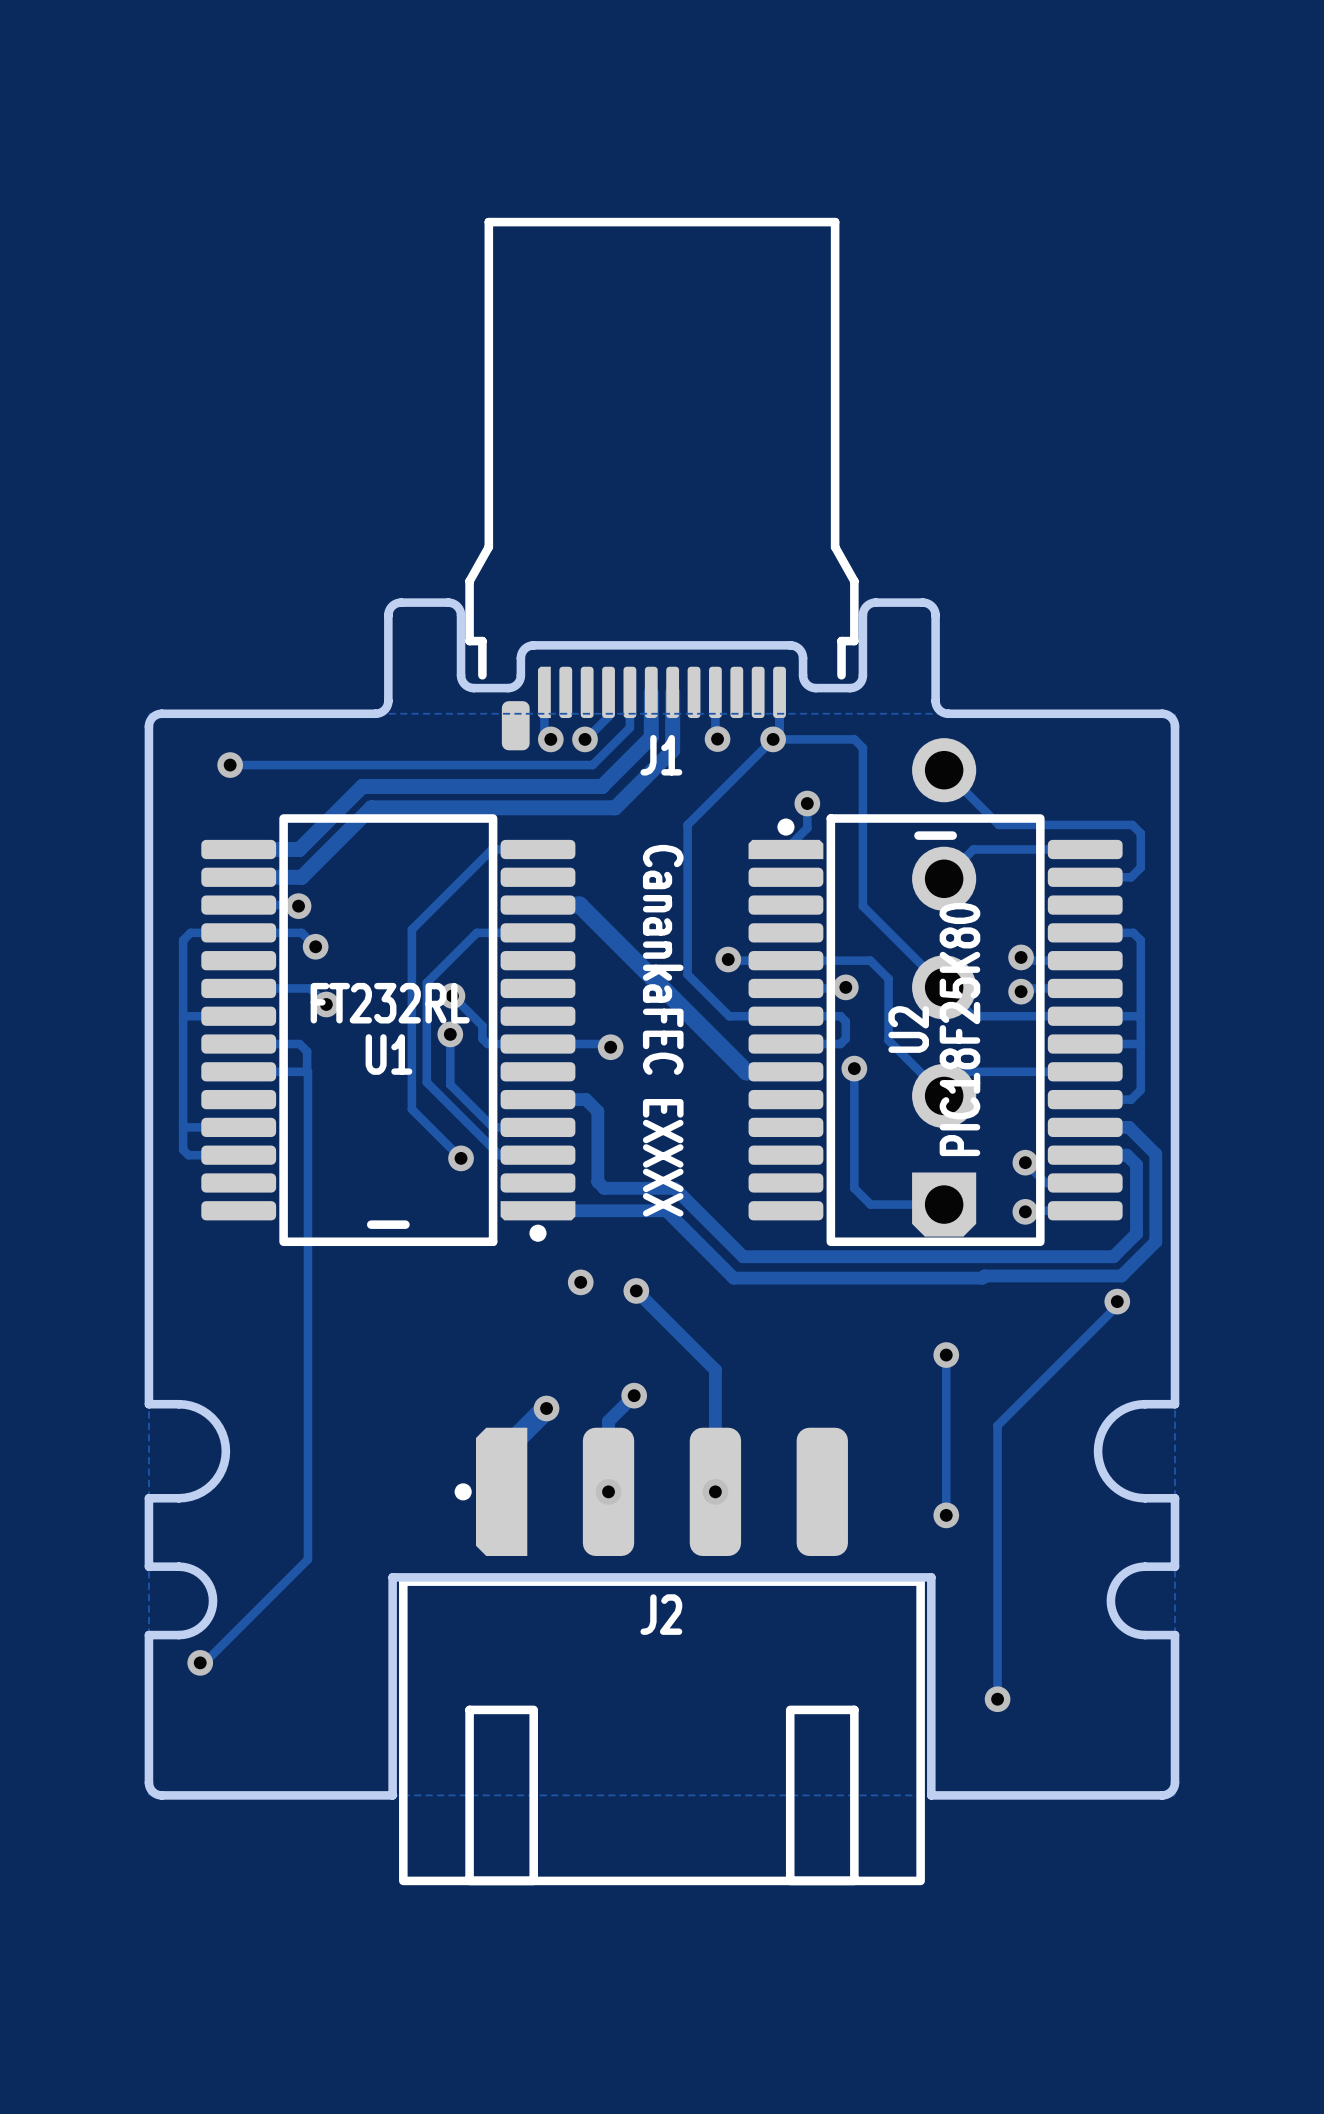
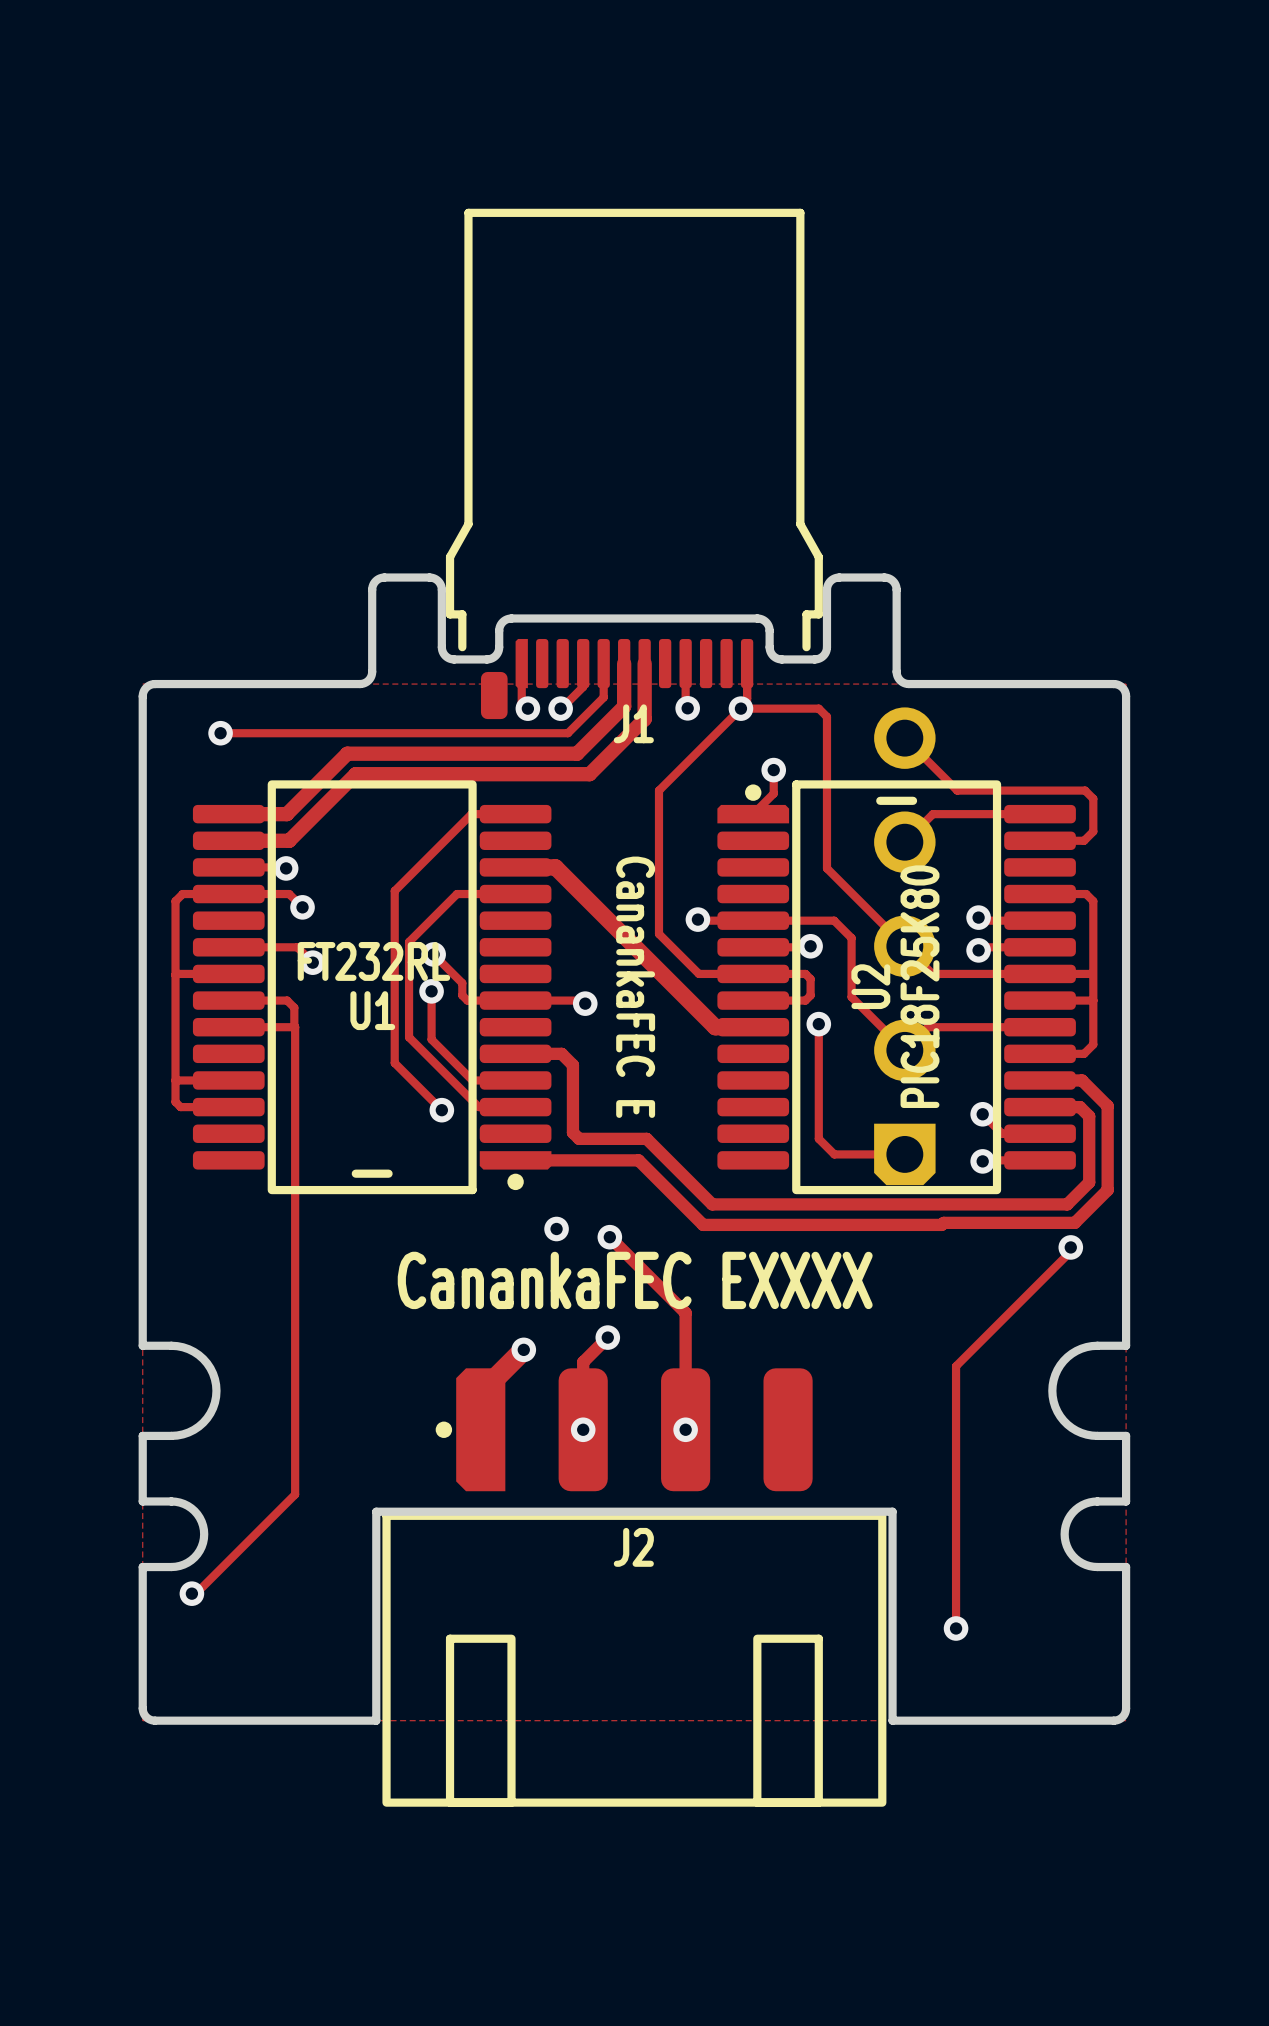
text: CanankaFEC EXXXX (663, 1030) -> CanankaFEC E (635, 987)
text: none -> CanankaFEC EXXXX (635, 1280)
track: (946, 1355) (946, 1515) -> none
via: (946, 1355) -> none
via: (946, 1515) -> none

